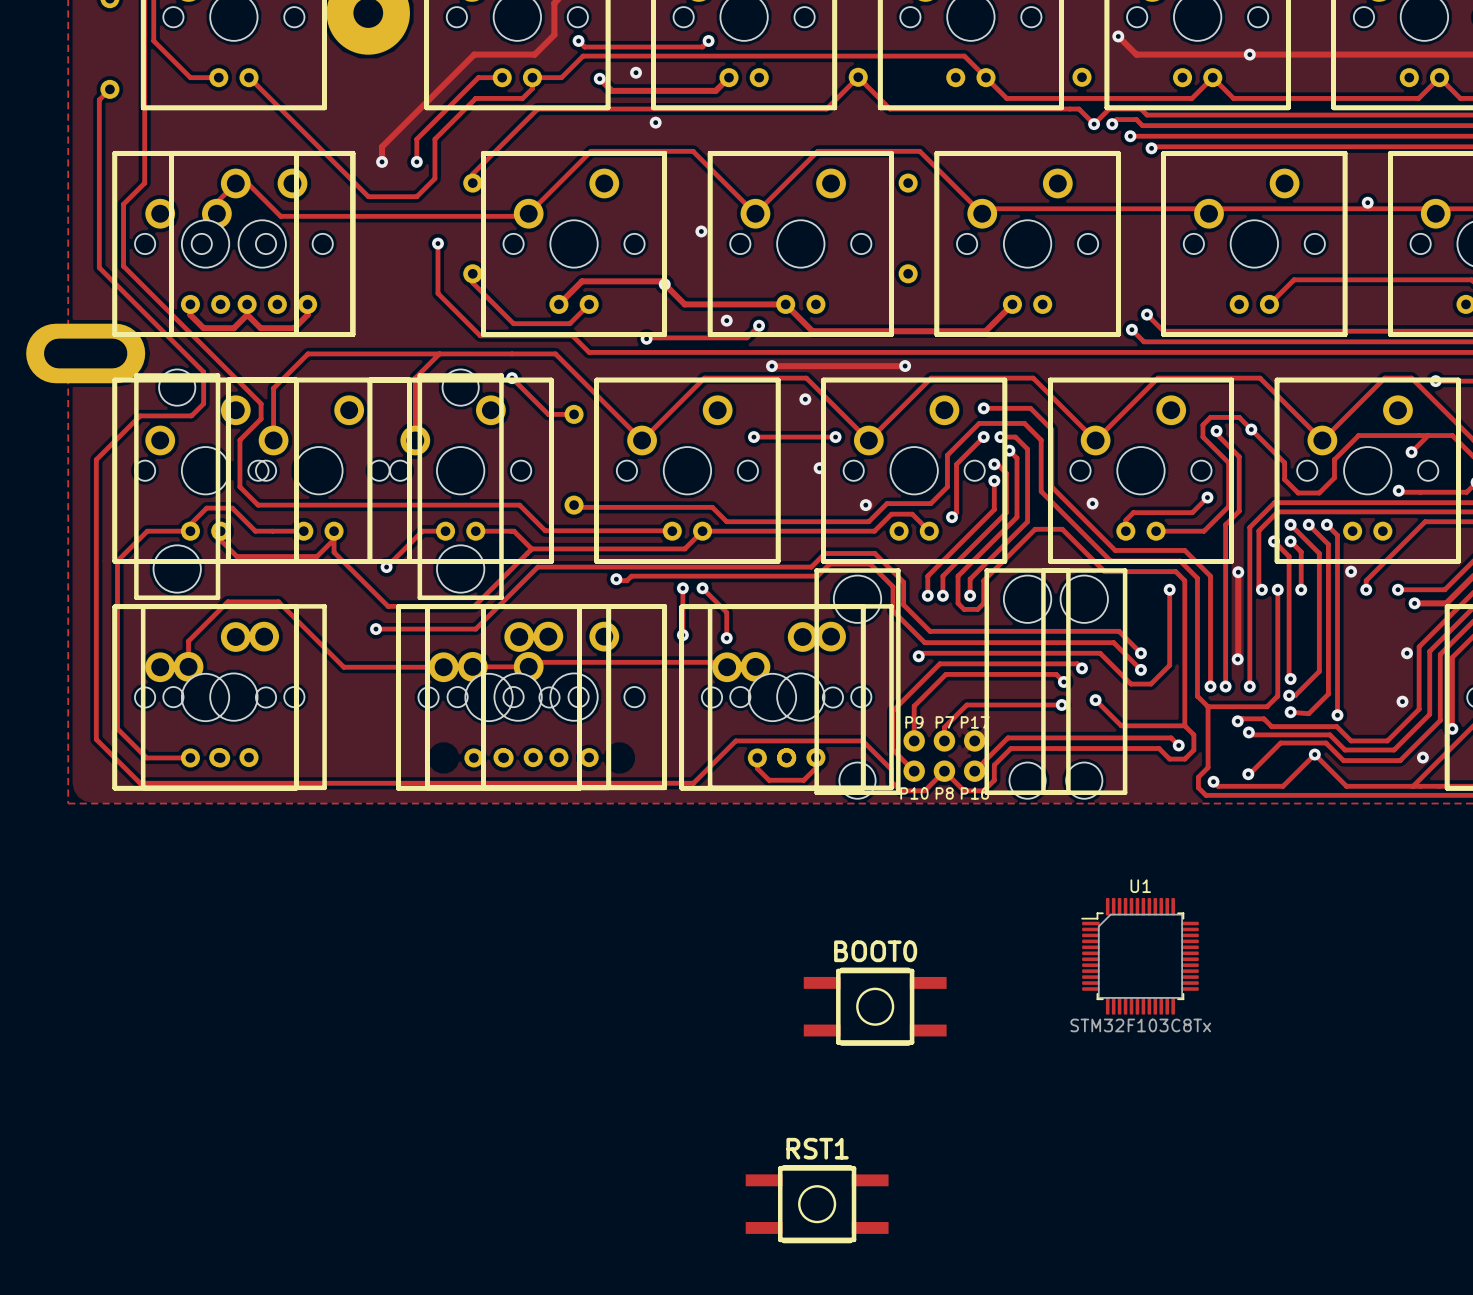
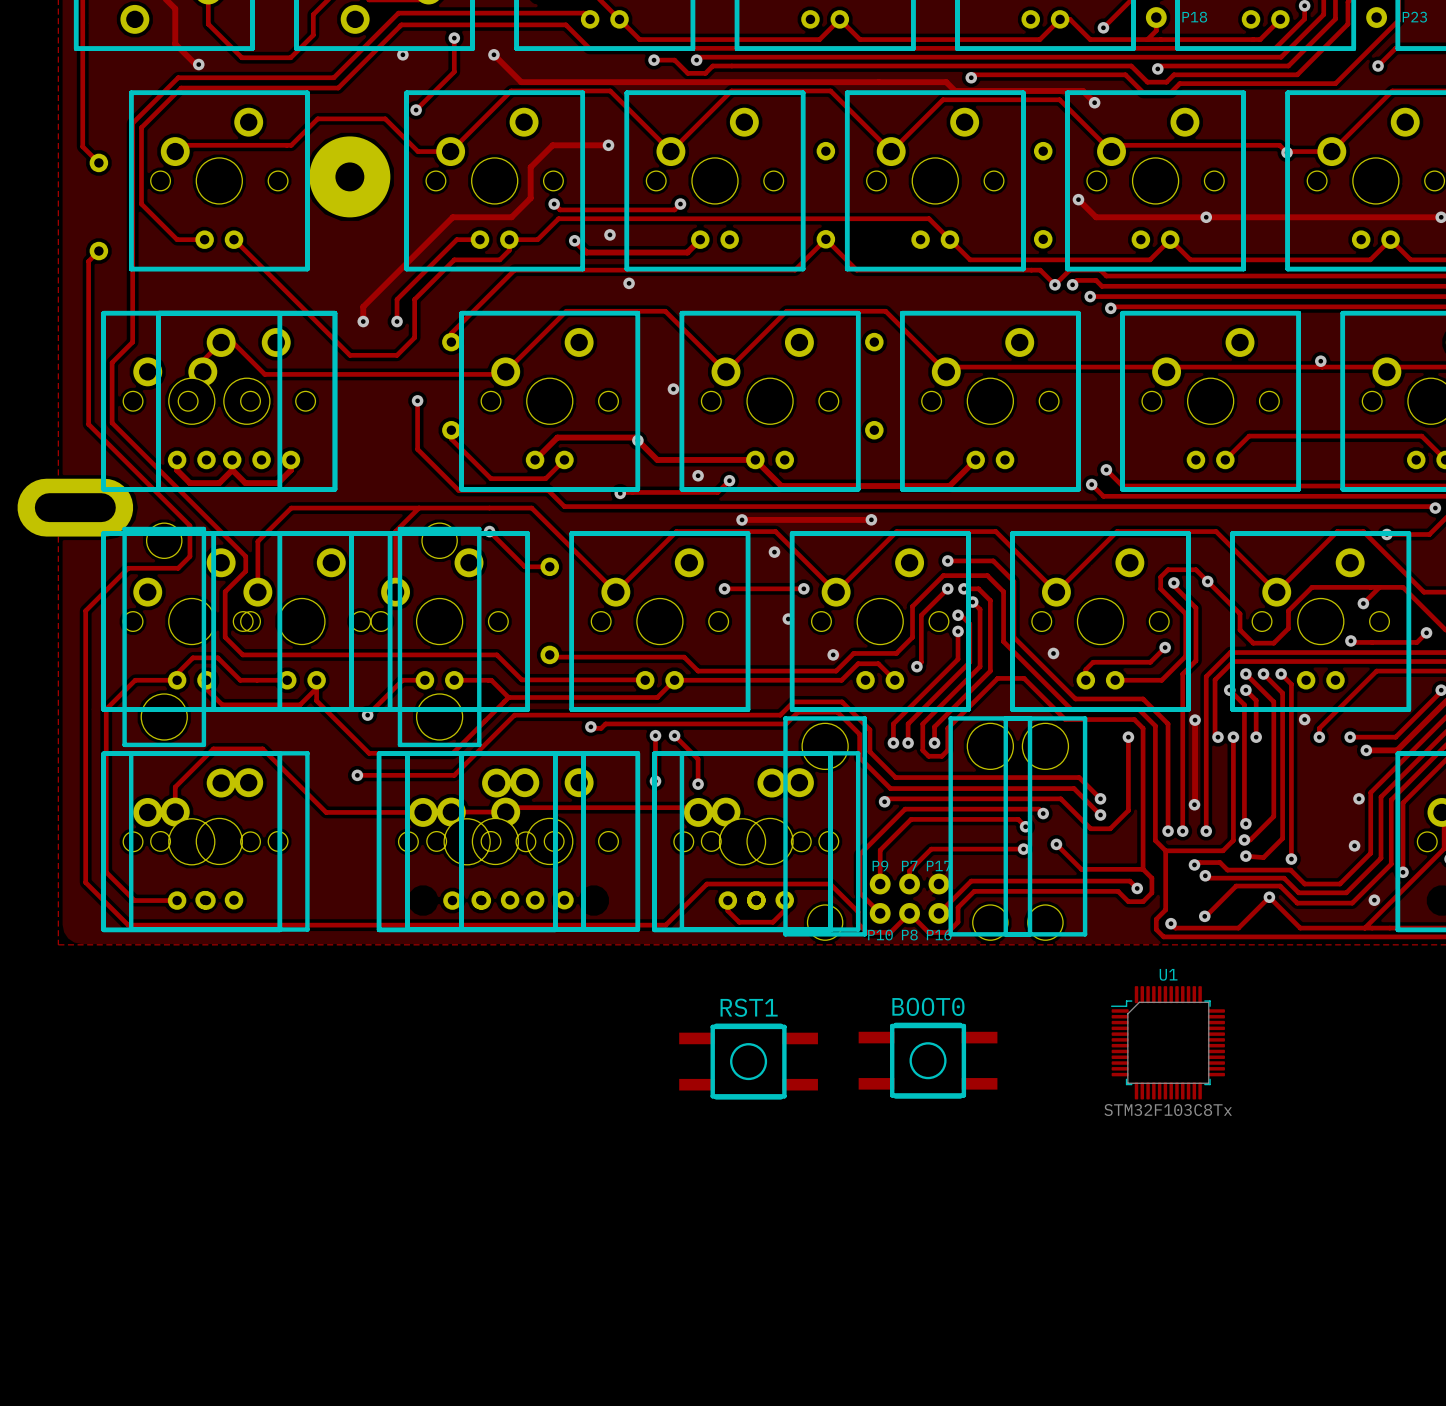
U1 position: (1140, 956) -> (1167, 1042)
BOOT0 position: (875, 1006) -> (928, 1060)
RST1 position: (817, 1204) -> (748, 1061)

